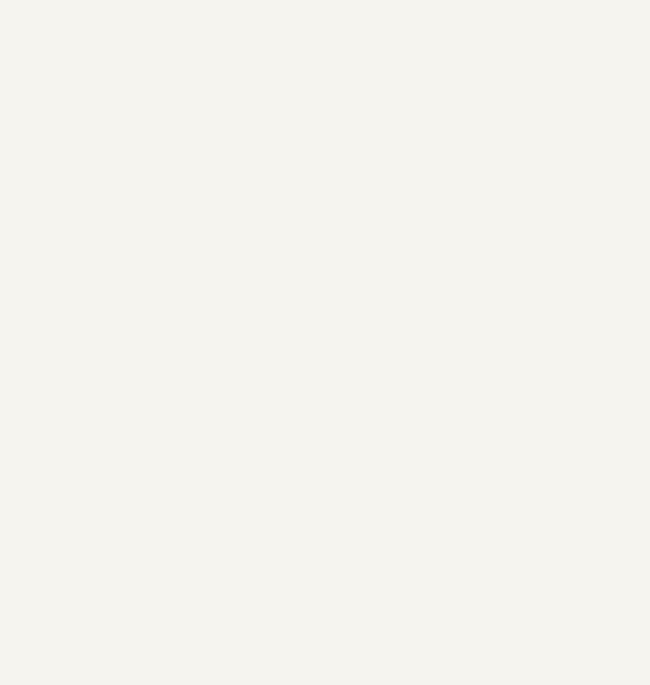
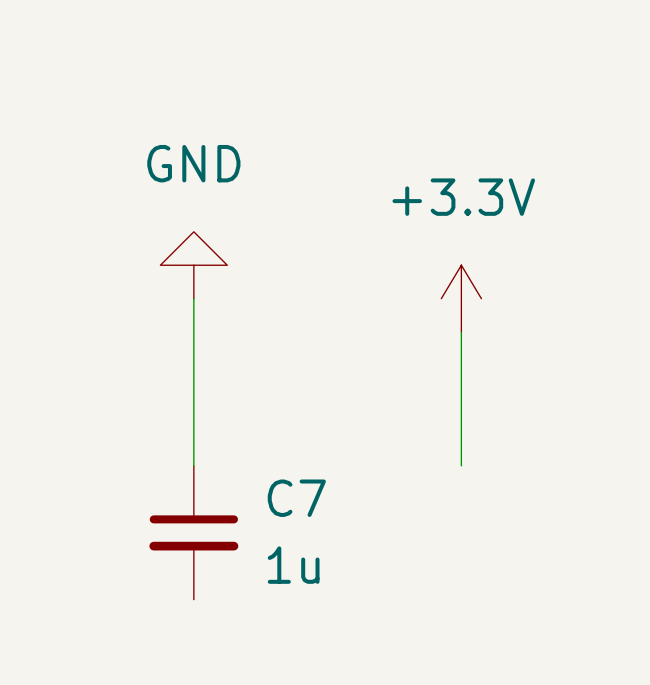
power symbol: none -> GND (193, 265)
wire: none -> (193, 298) (193, 465)
power symbol: none -> +3.3V (461, 298)
wire: none -> (461, 332) (461, 465)
C7: none -> 1u (193, 532)

